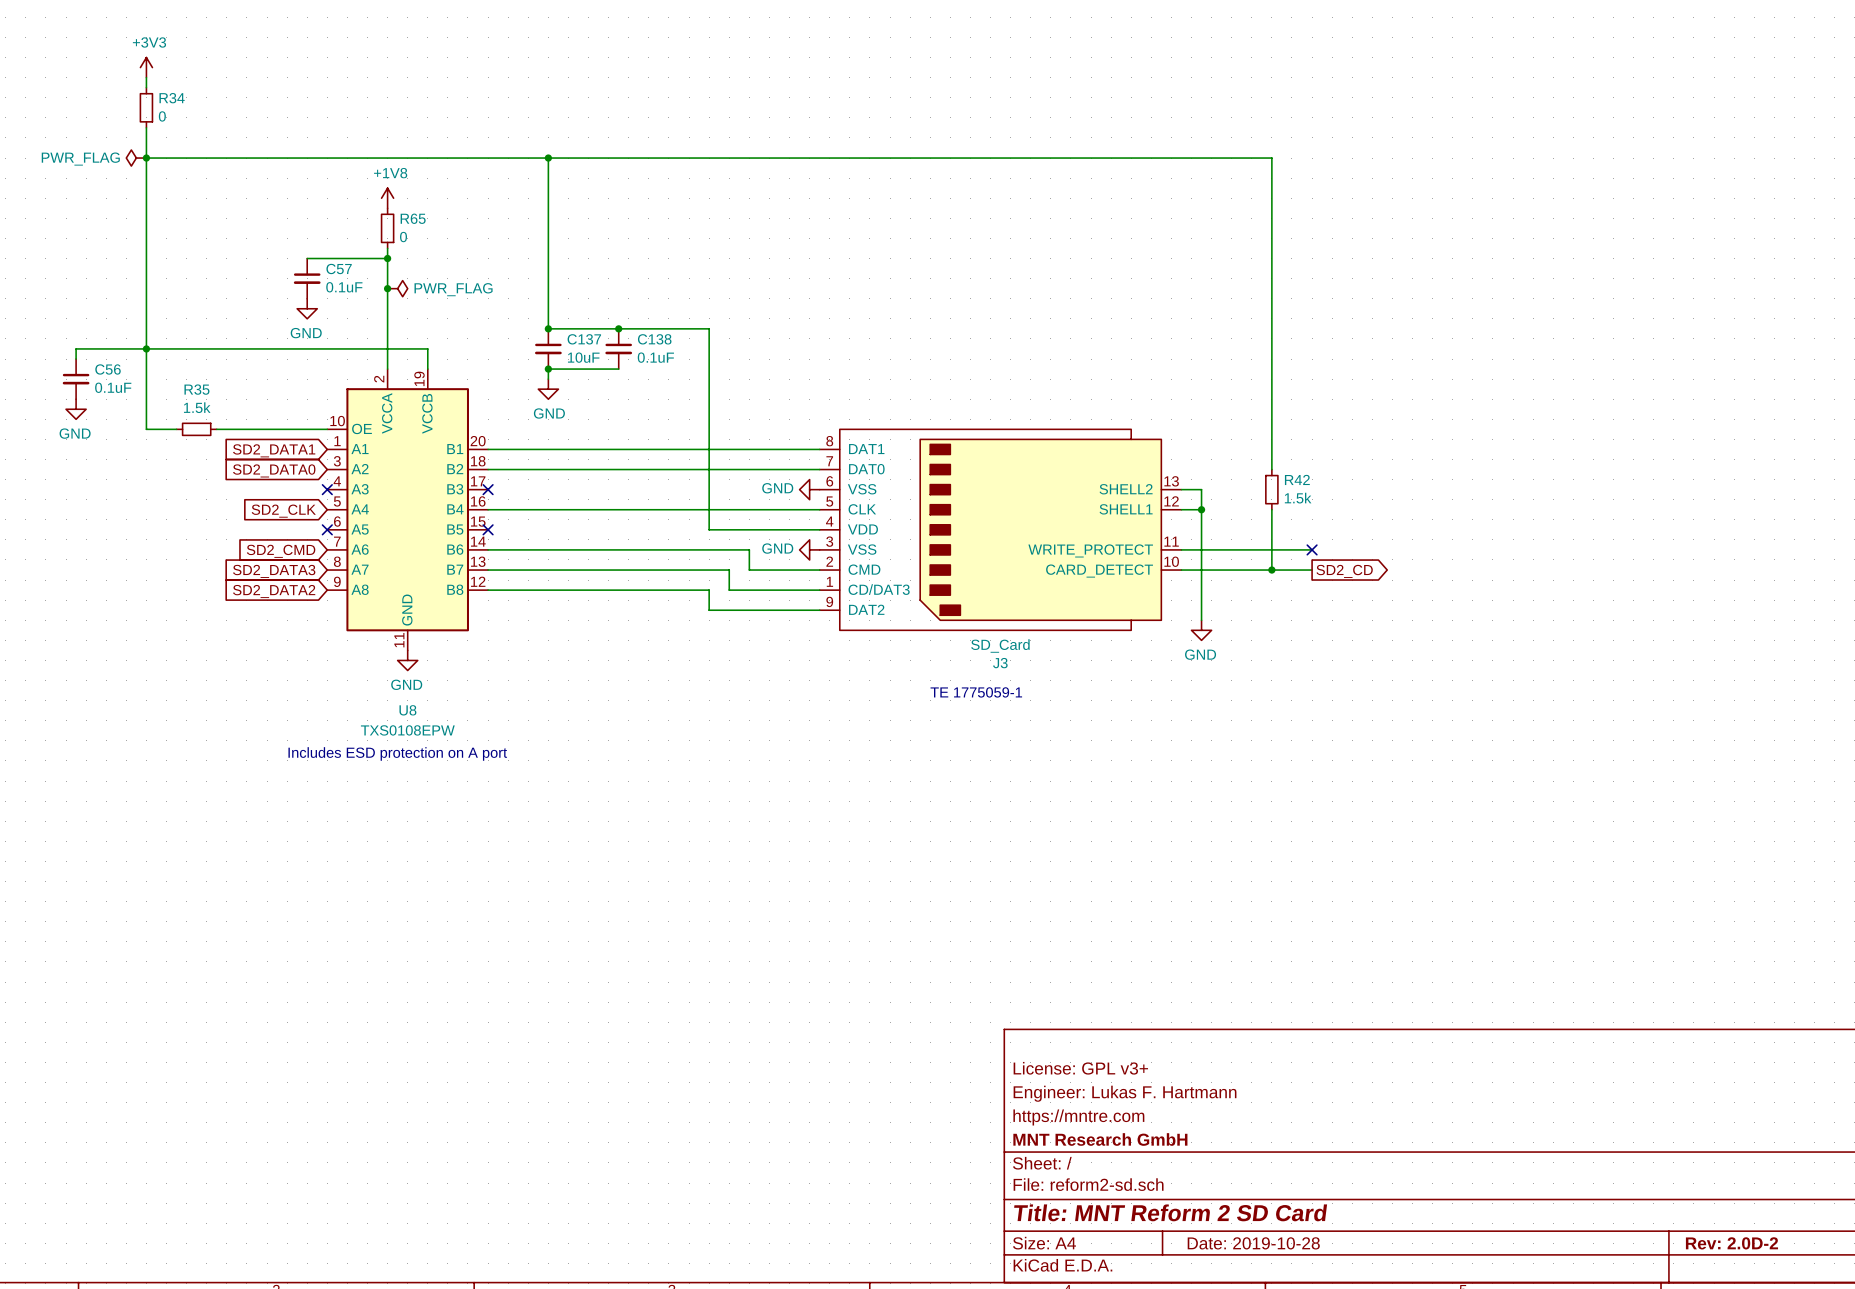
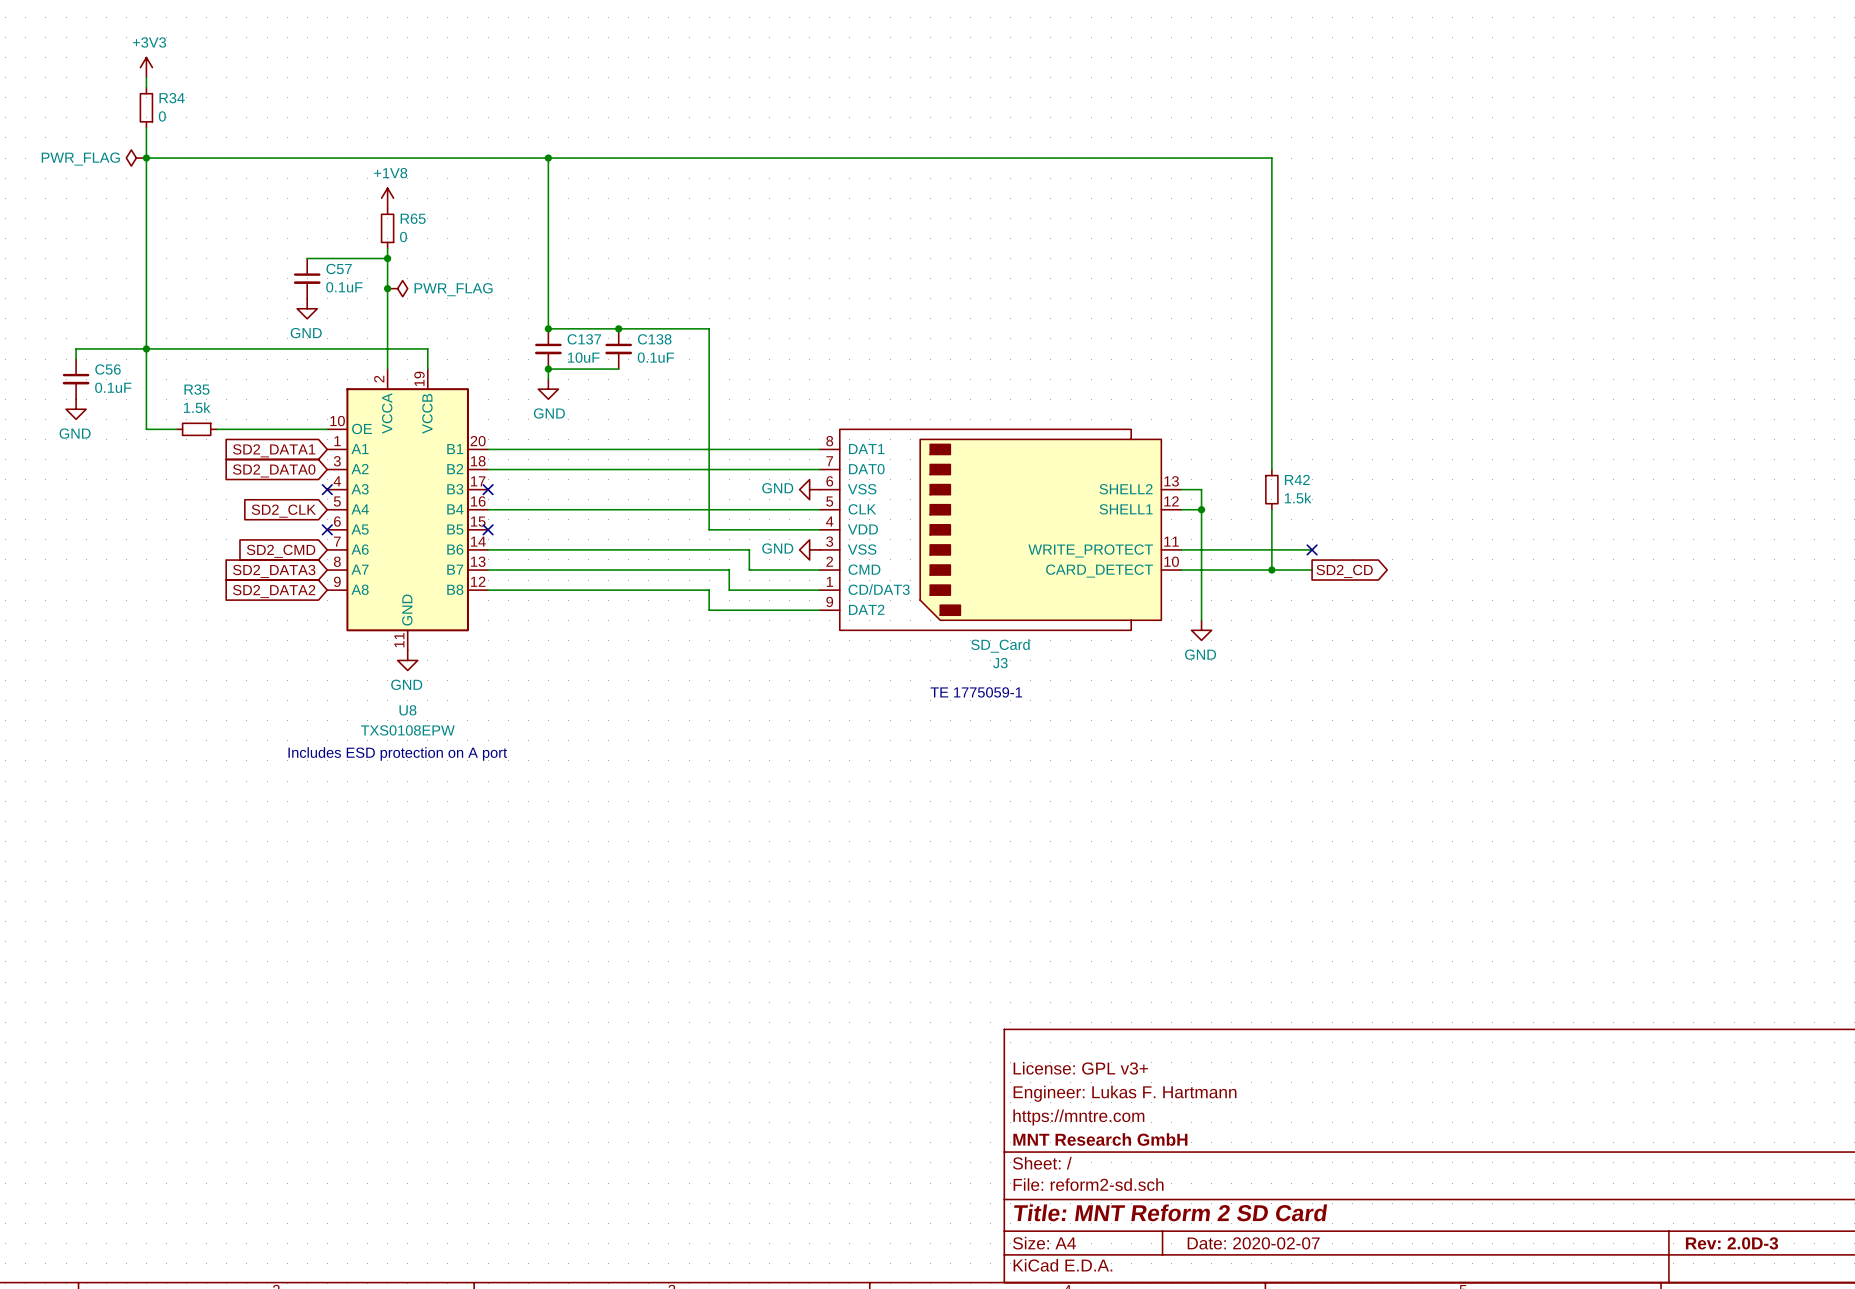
title block: Date: 2019-10-28 (1253, 1243) -> Date: 2020-02-07 (1253, 1243)
title block: Rev: 2.0D-2 (1731, 1243) -> Rev: 2.0D-3 (1732, 1243)

